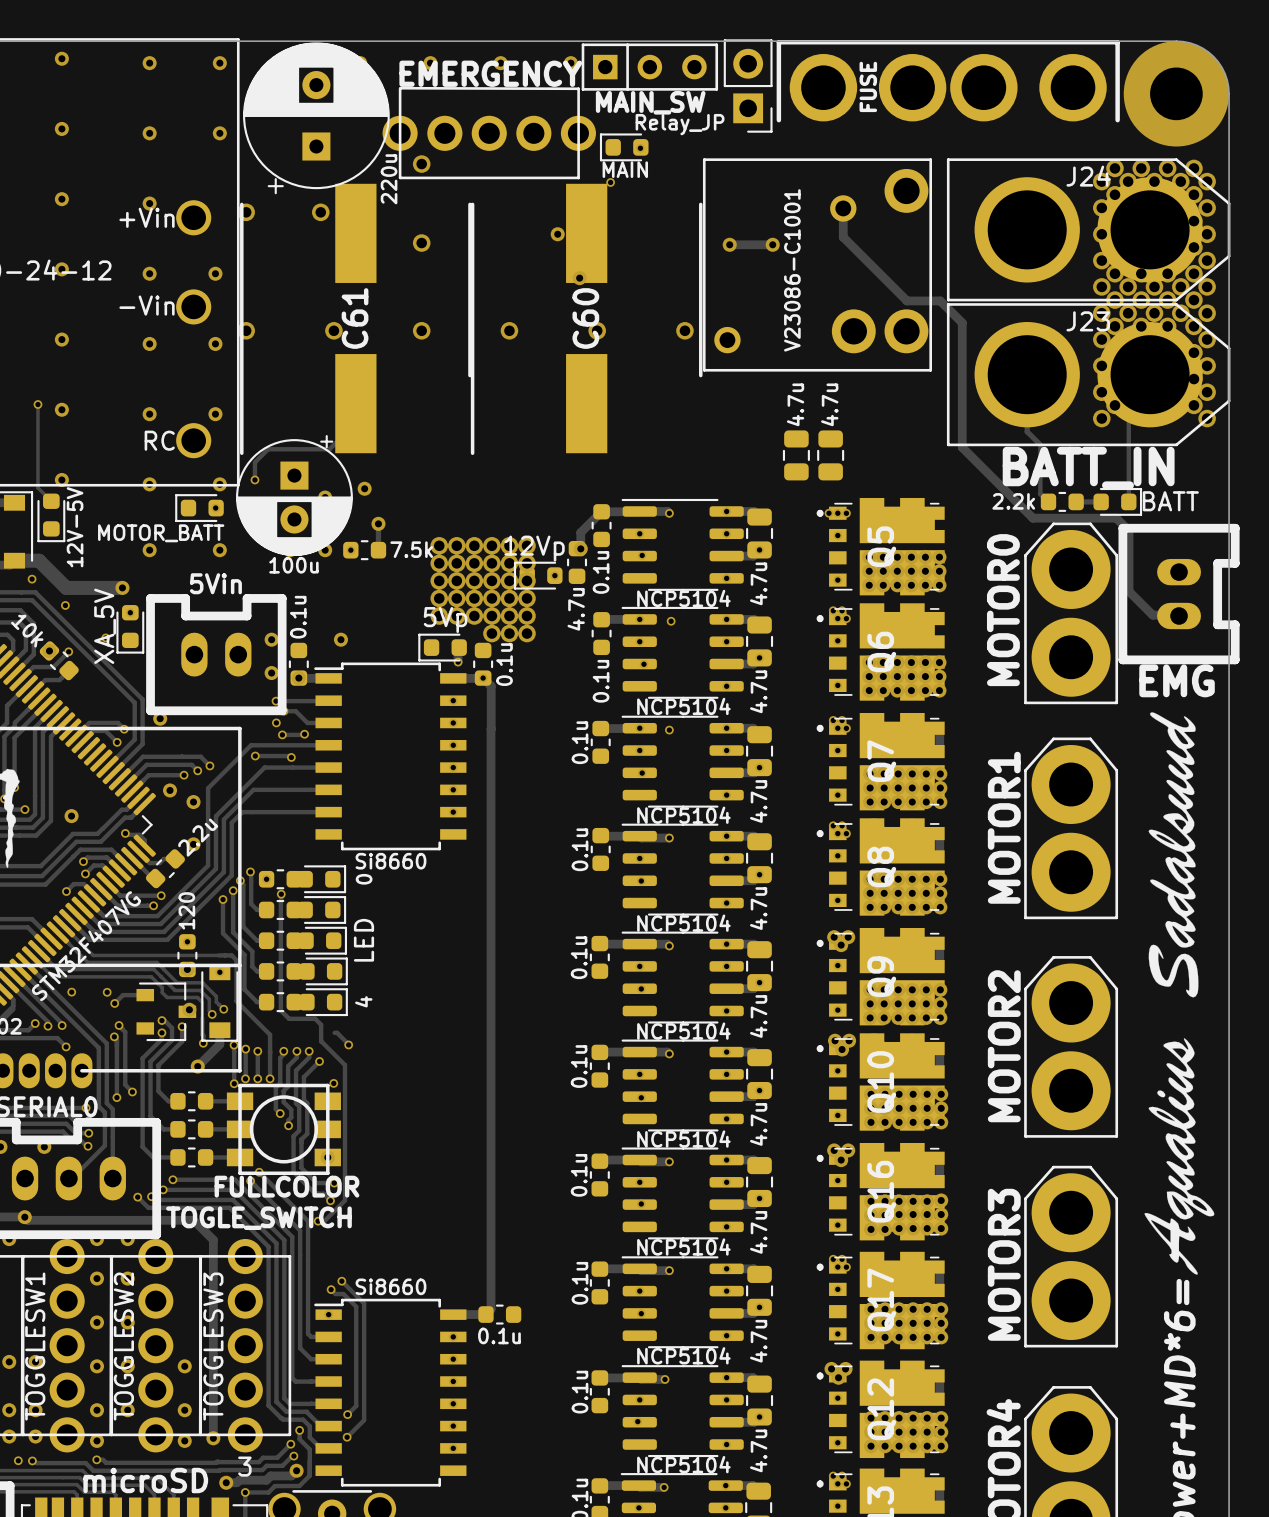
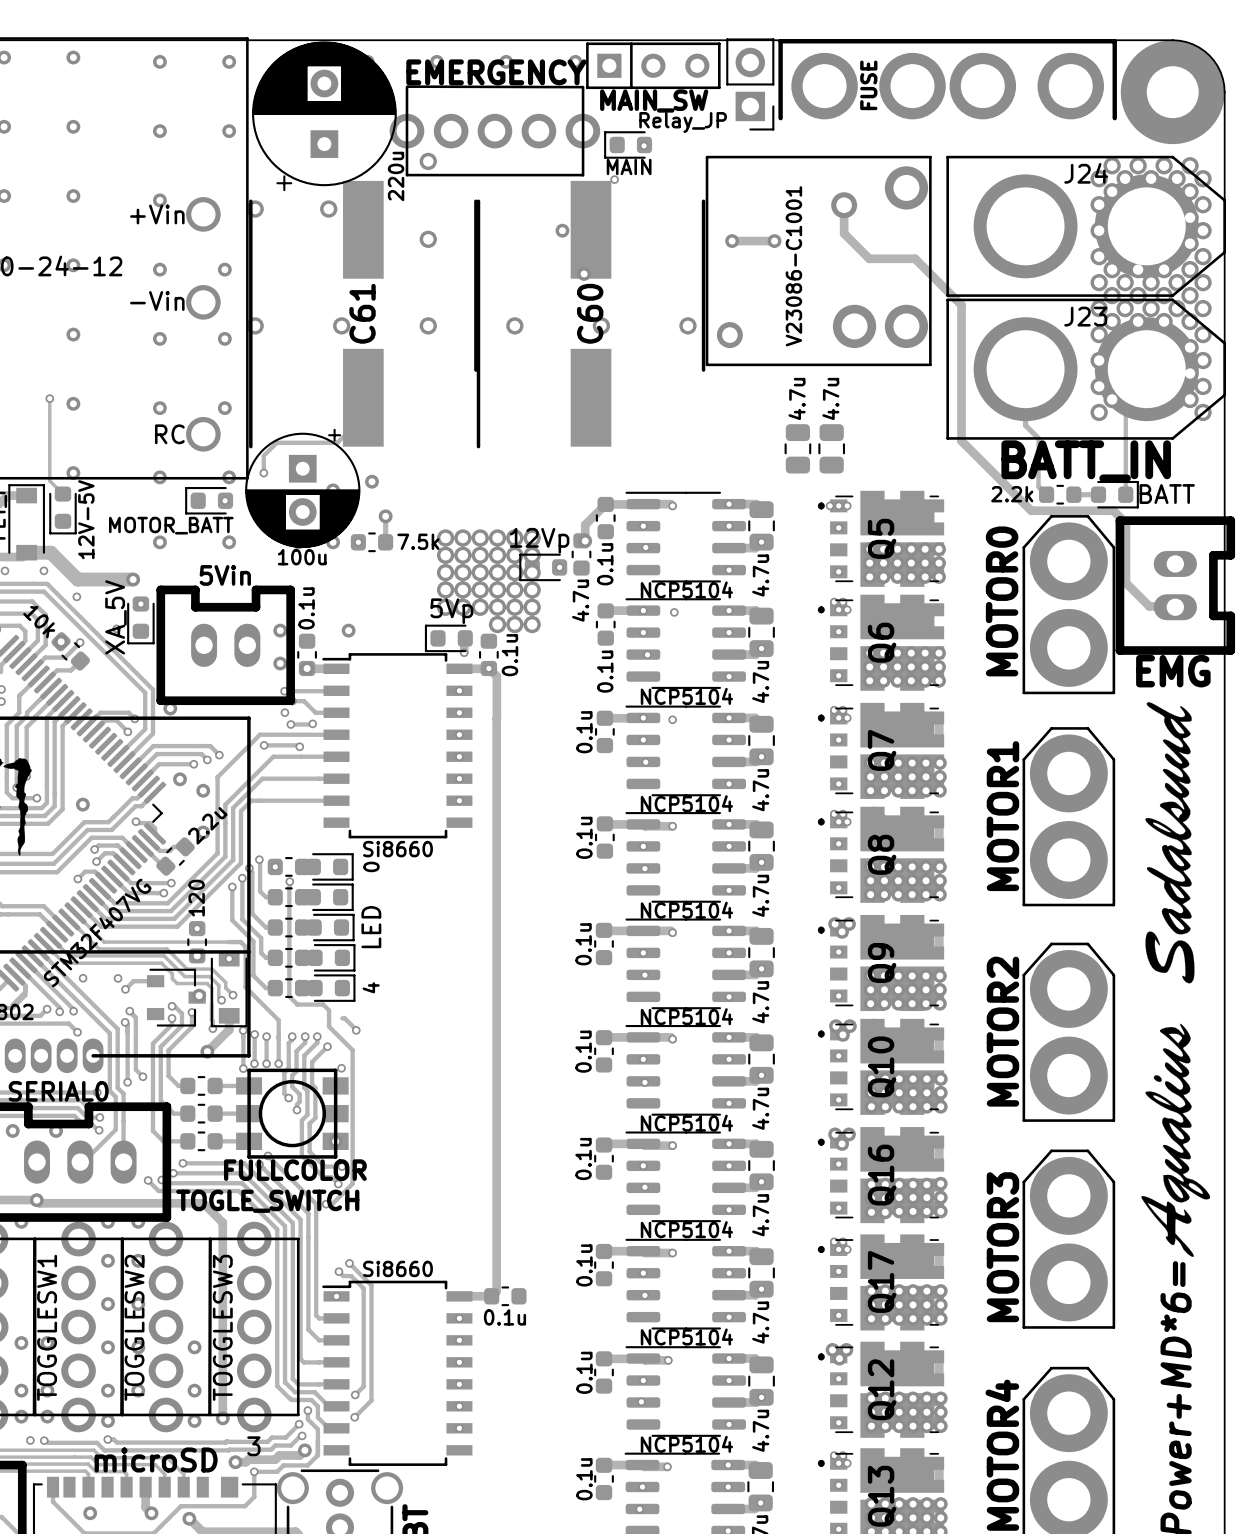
track: (868, 262) (906, 300) (940, 300) (962, 322) -> (869, 258) (915, 258) (961, 305) (961, 318)

